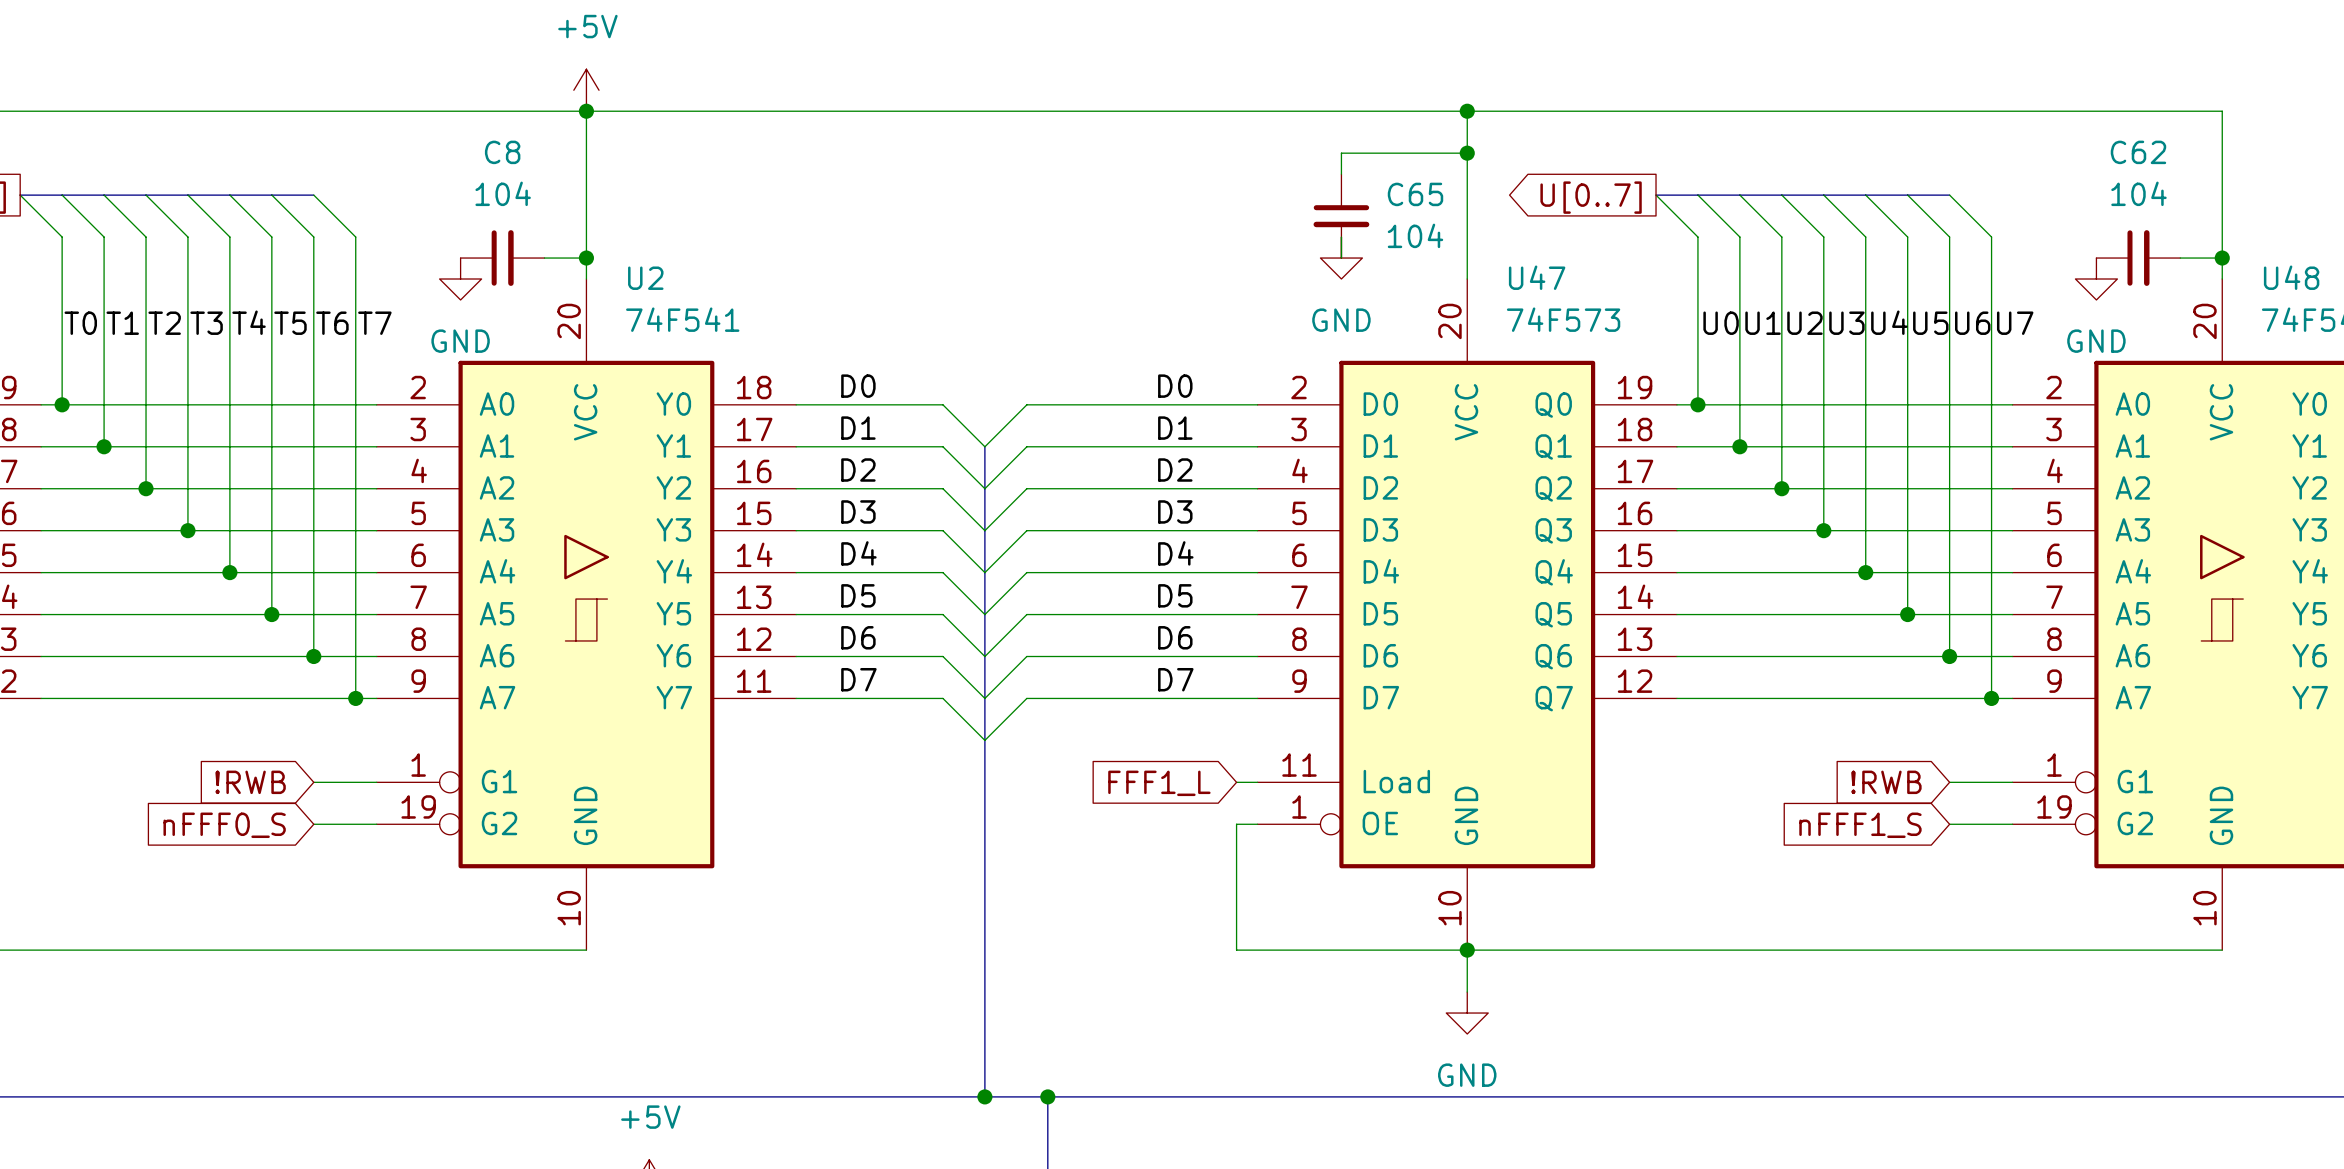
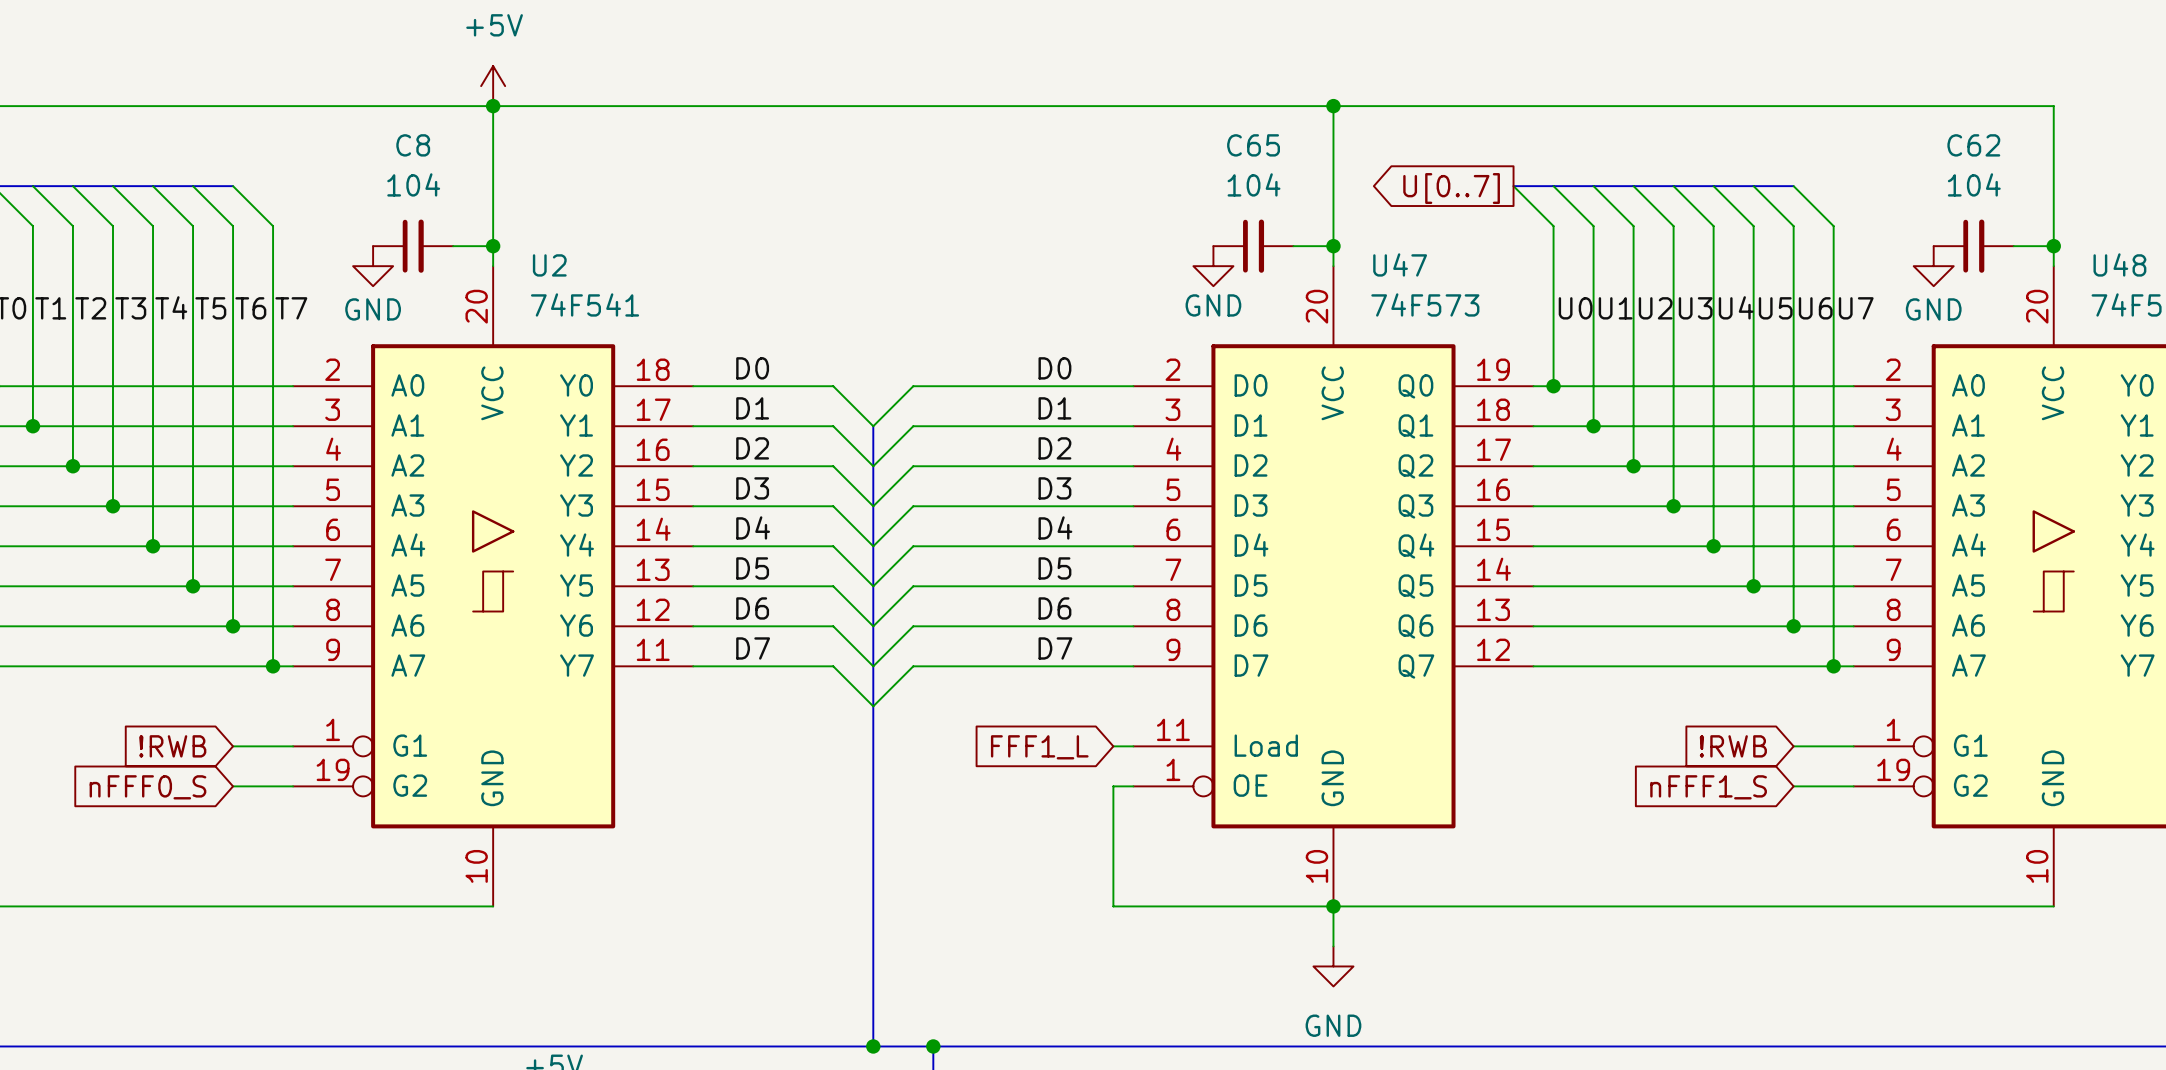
wire: (1467, 153) (1341, 153) (1341, 174) -> none
junction: (1467, 153) -> none
C65 name position: C65 (1415, 194) -> C65 (1253, 145)
C65 rotation: 0° (1341, 216) -> 90° counterclockwise (1253, 246)
C65 position: (1341, 216) -> (1253, 246)
wire: (1341, 237) (1341, 258) -> none
power symbol position: GND (1341, 258) -> GND (1213, 266)
wire: none -> (1293, 246) (1333, 246)
junction: none -> (1333, 246)
power symbol text position: GND (460, 341) -> GND (373, 309)
power symbol text position: GND (2096, 341) -> GND (1933, 309)

